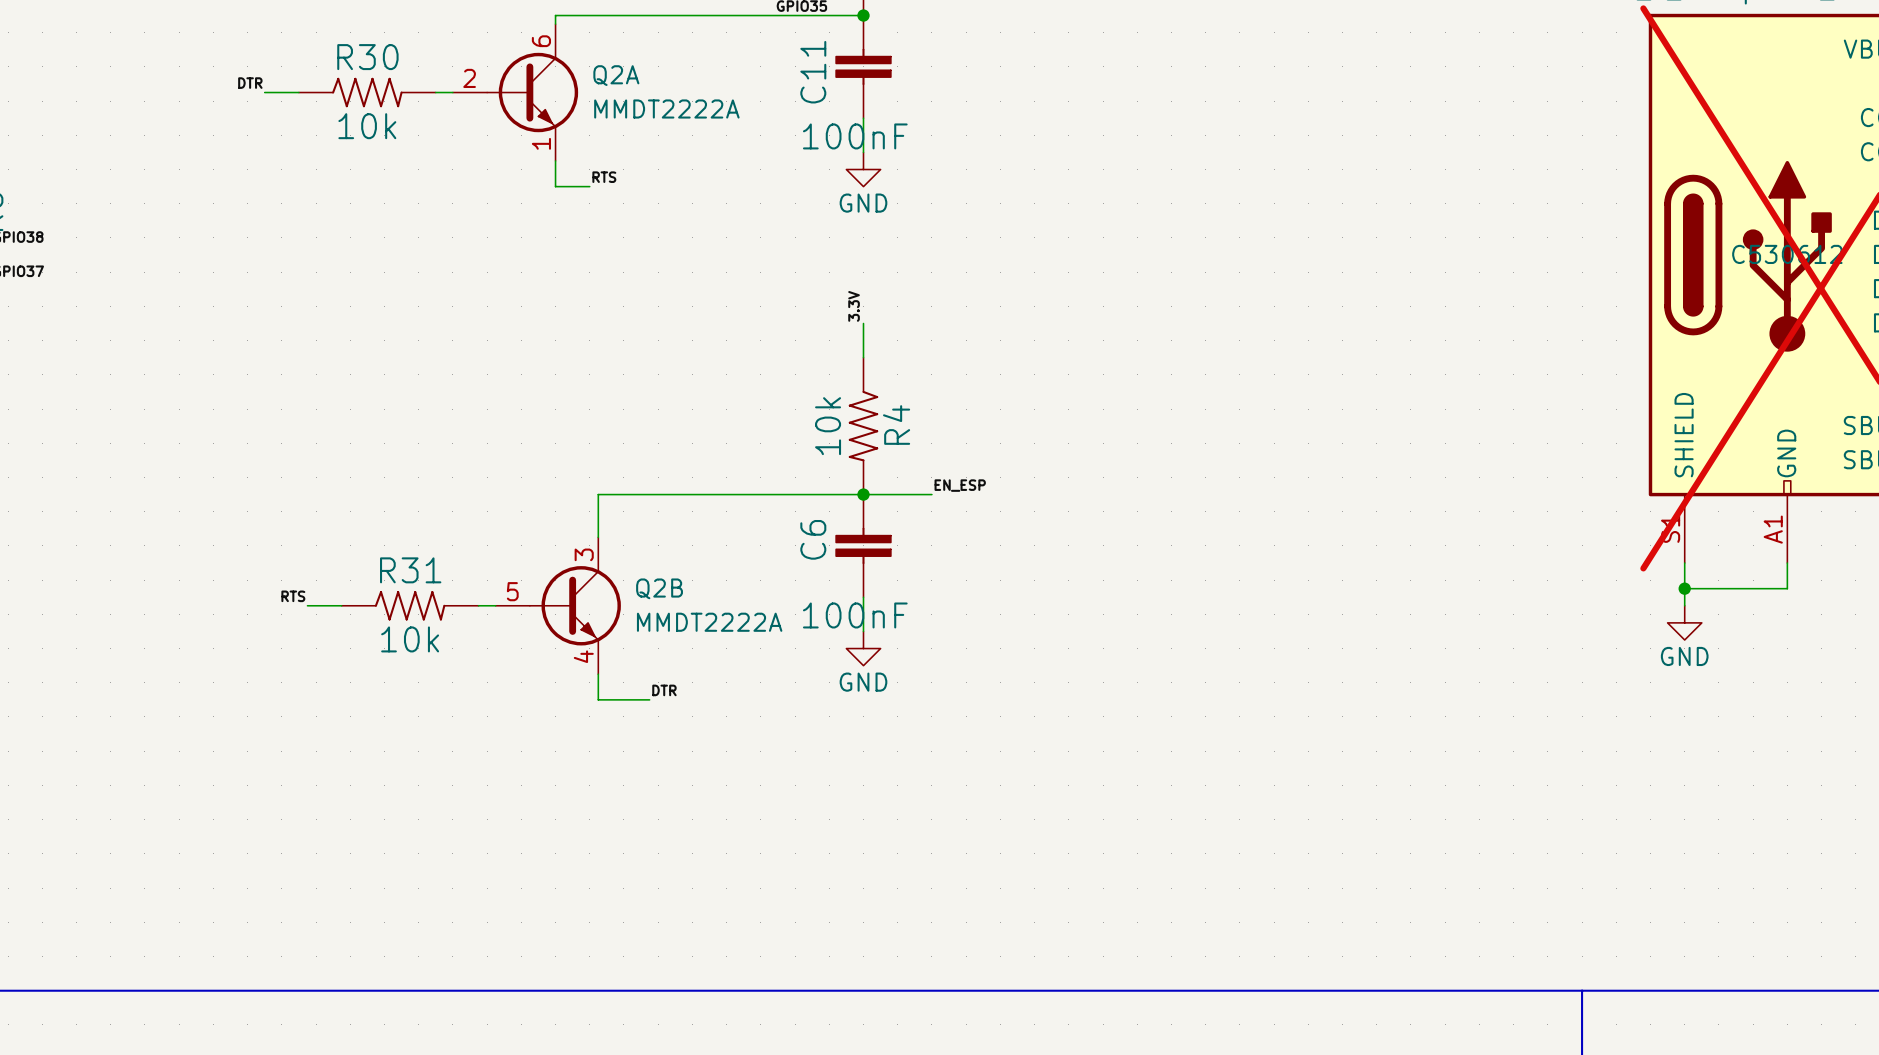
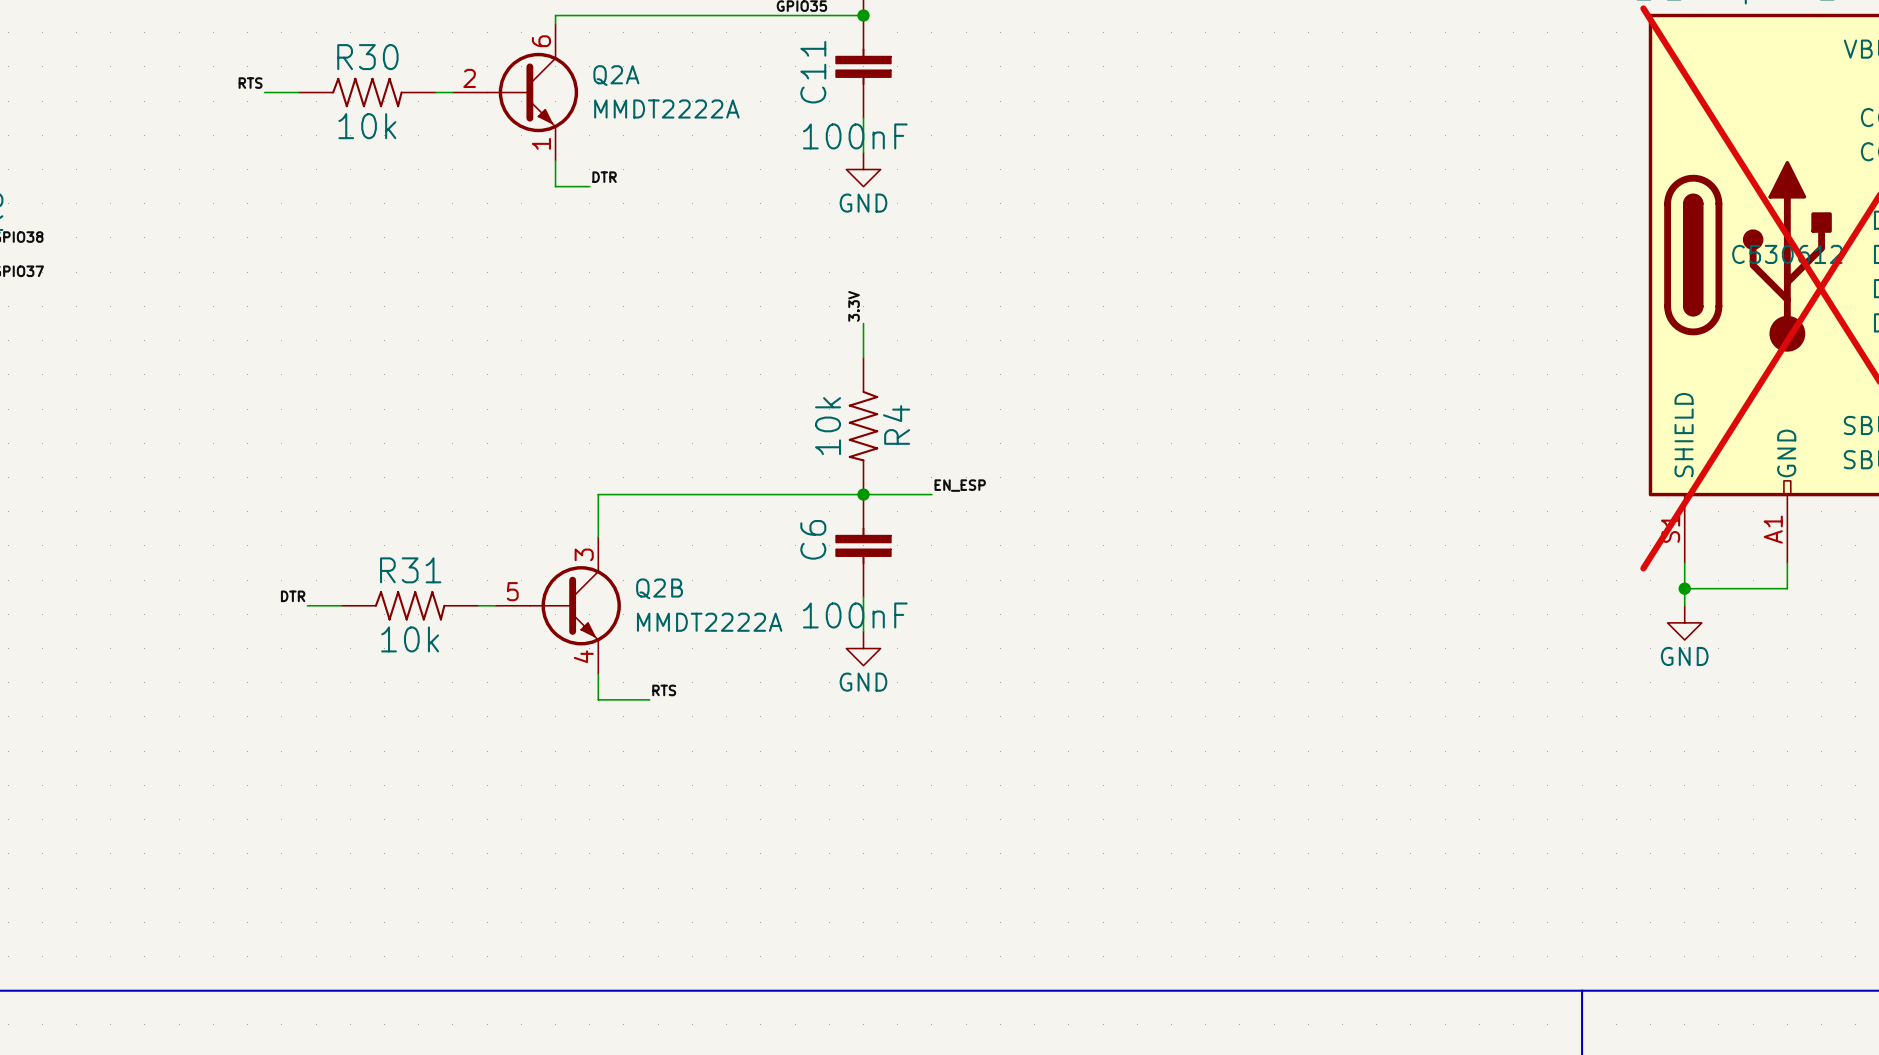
label: DTR (250, 83) -> RTS (250, 83)
label: RTS (604, 177) -> DTR (604, 177)
label: RTS (293, 596) -> DTR (293, 596)
label: DTR (664, 690) -> RTS (664, 690)

